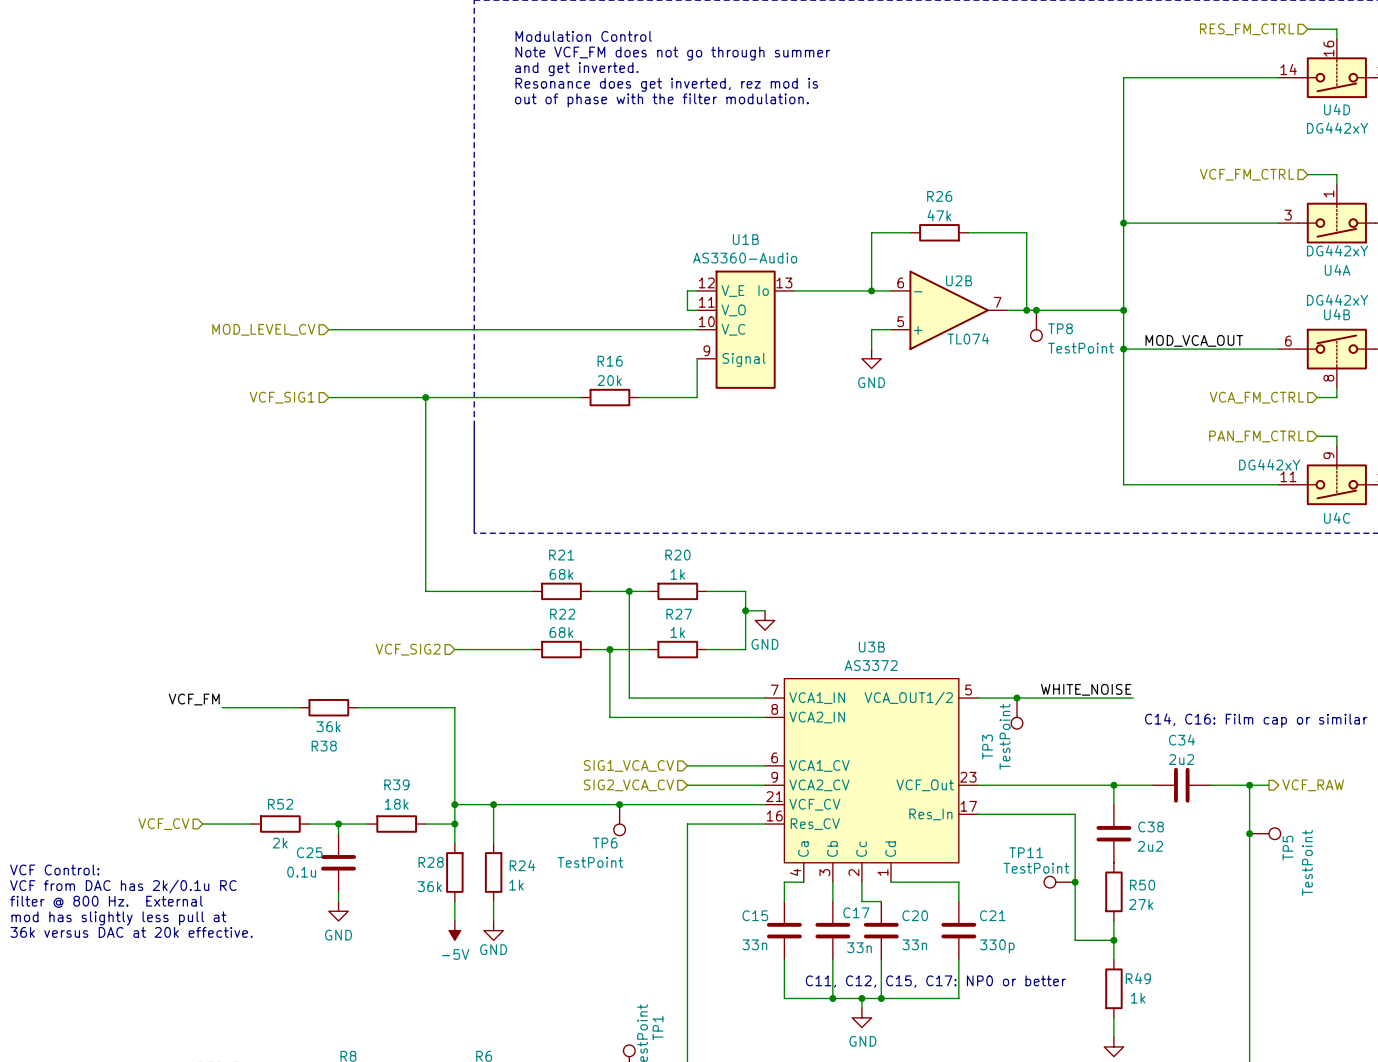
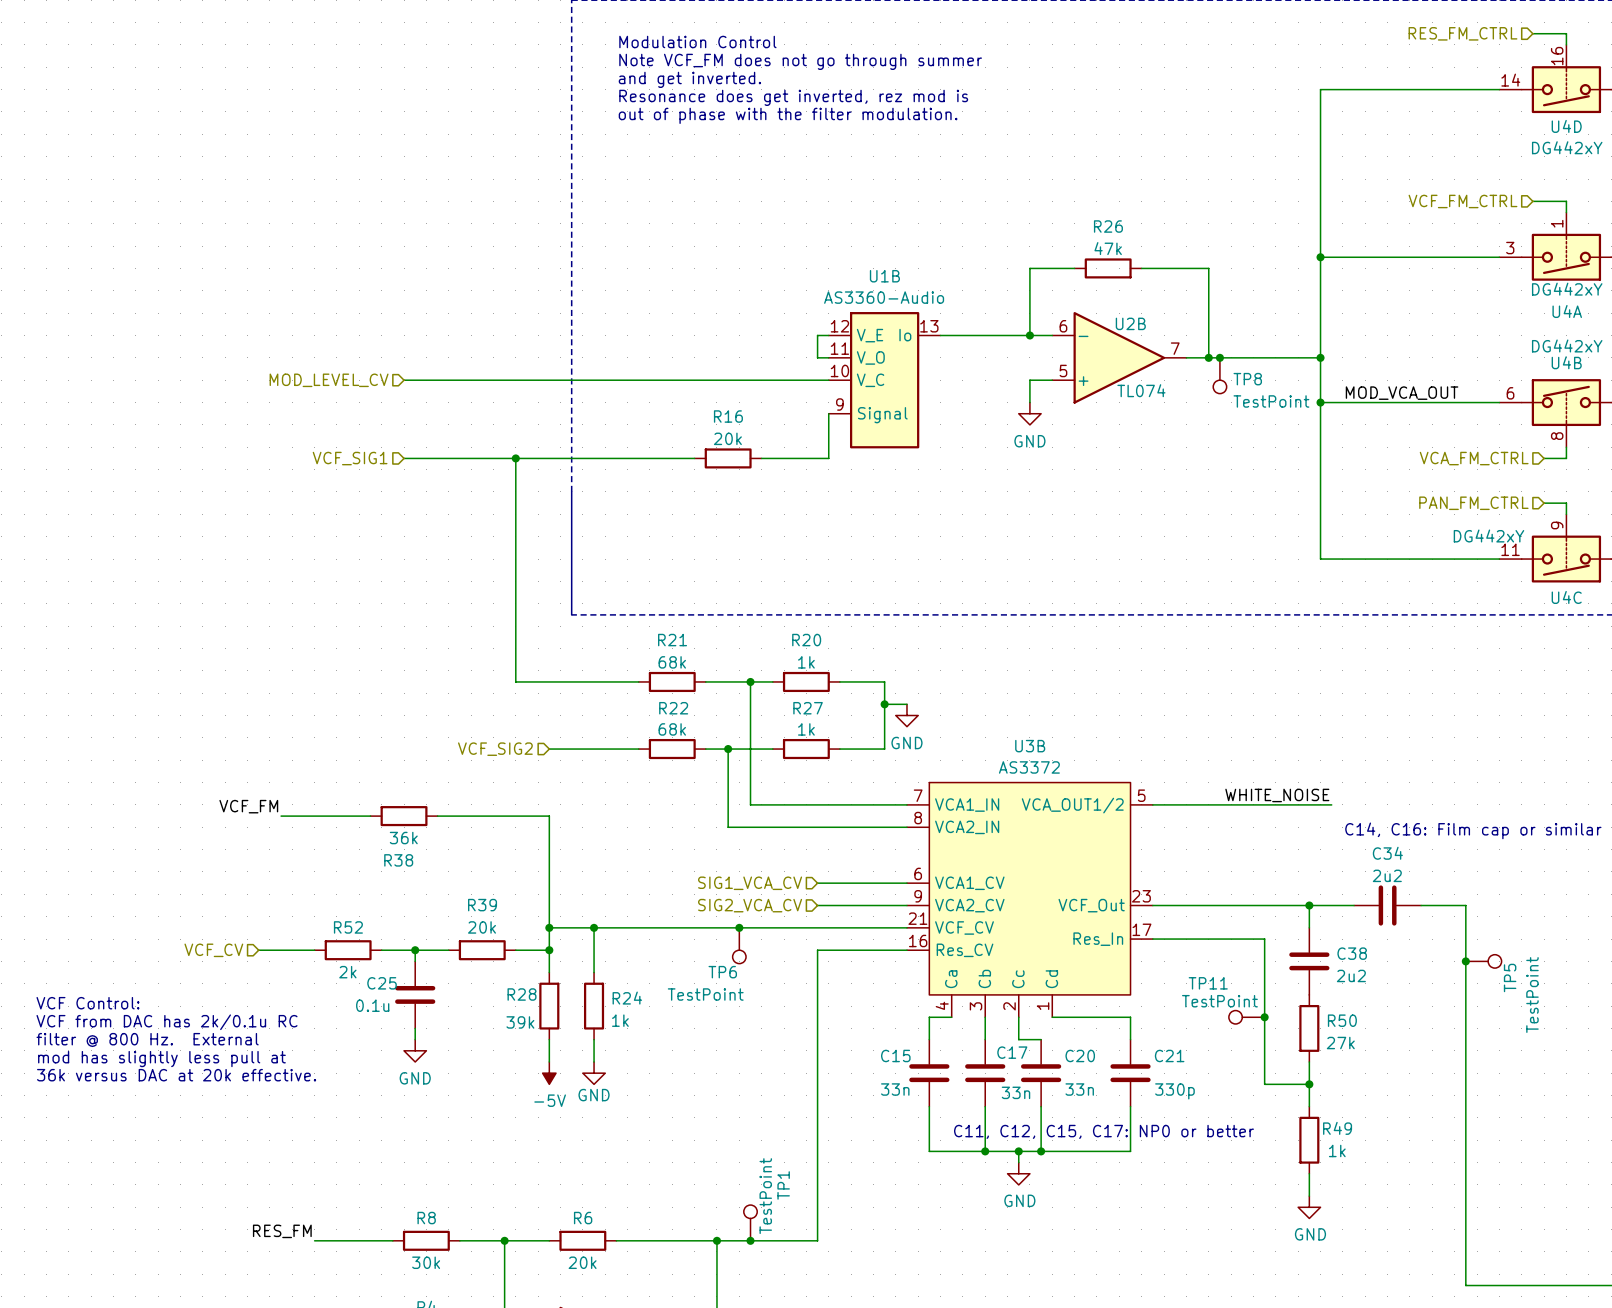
junction: (1017, 698) -> none
TP3: TestPoint (1017, 713) -> none
wire: (1249, 785) (1269, 785) -> none
junction: (1249, 785) -> none
hierarchical label: VCF_RAW (1313, 785) -> none
R39 value: 18k (396, 804) -> 20k (482, 927)
R28 value: 36k (429, 886) -> 39k (520, 1022)

